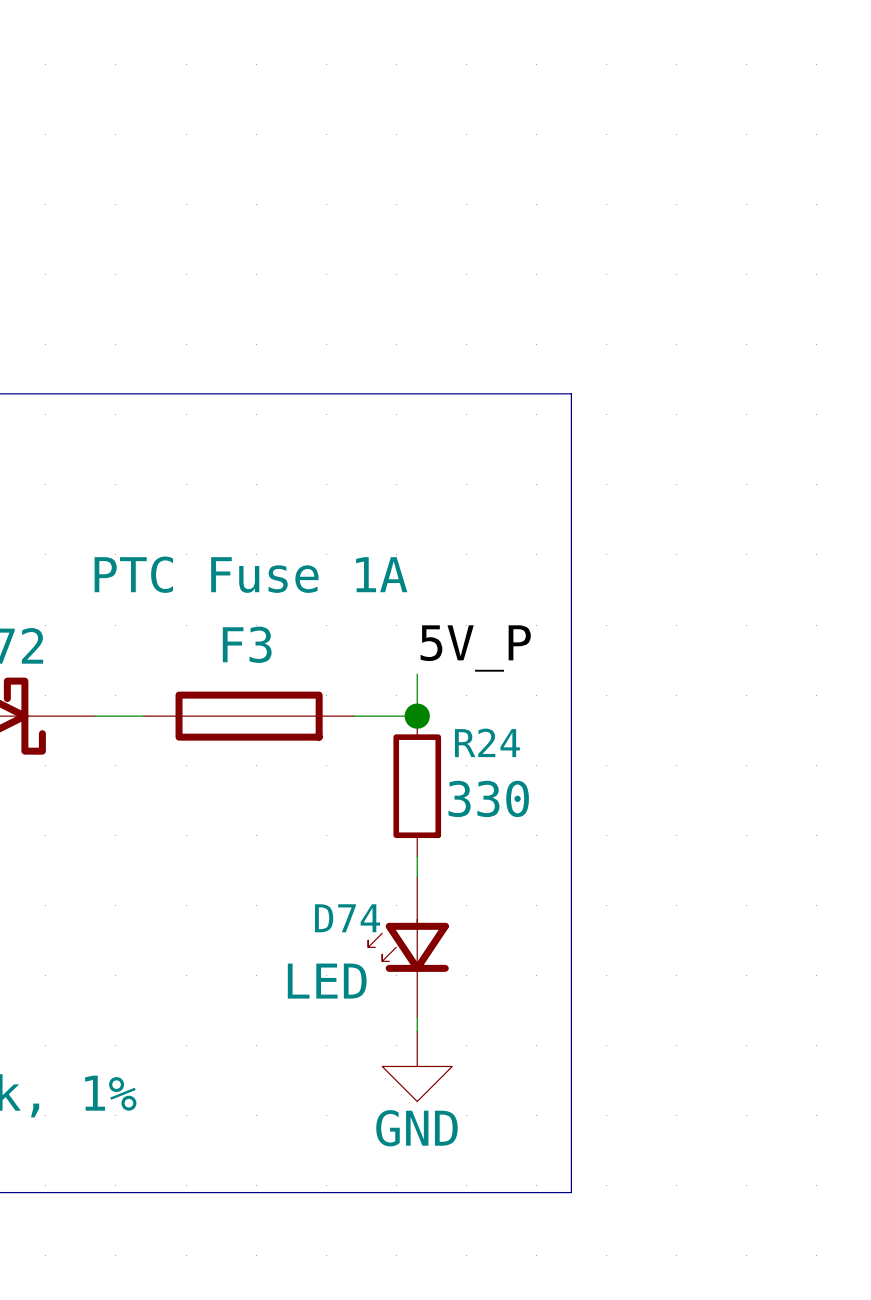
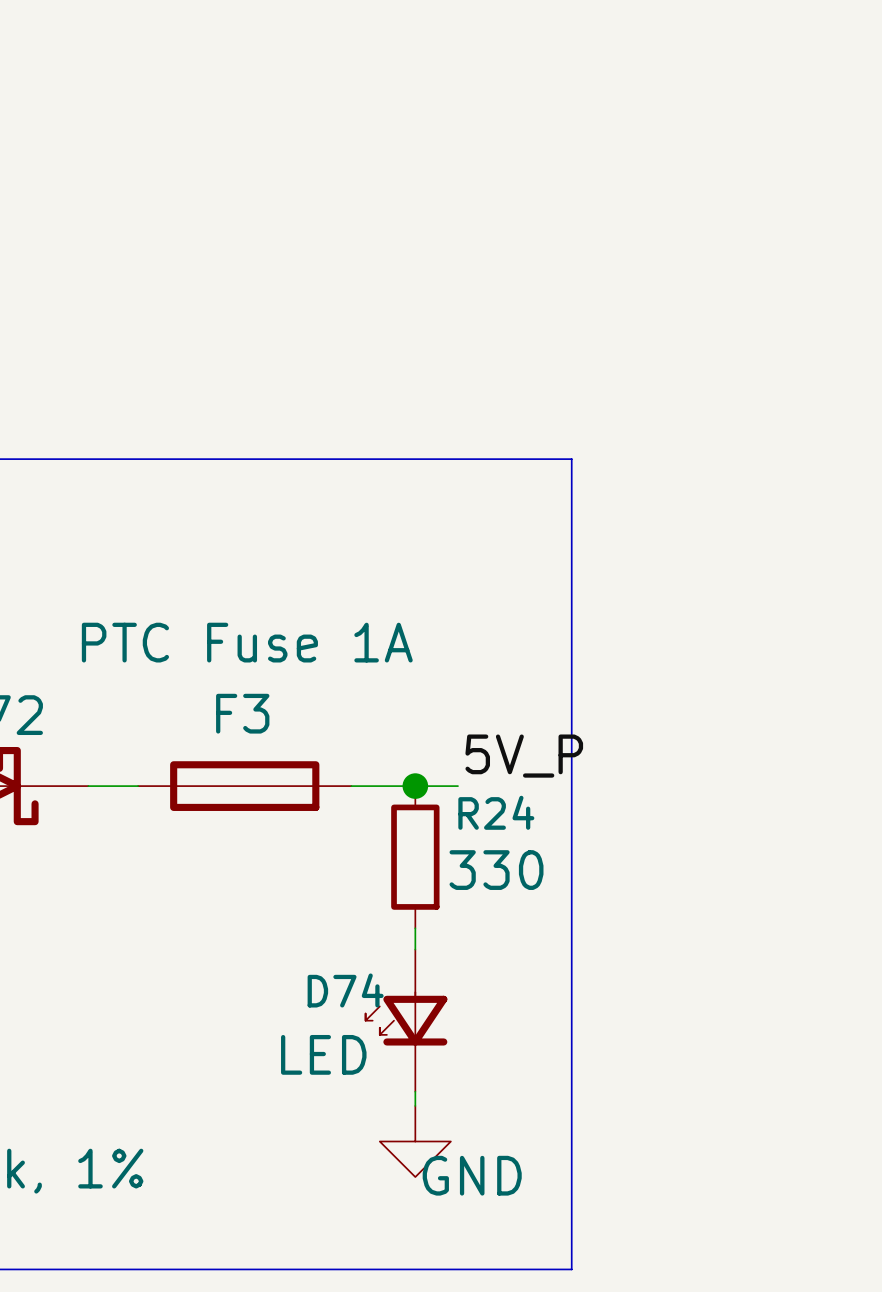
label position: 5V_P (475, 648) -> 5V_P (524, 756)
wire: (417, 674) (417, 716) -> (457, 786) (415, 786)
power symbol text position: GND (416, 1128) -> GND (472, 1175)

